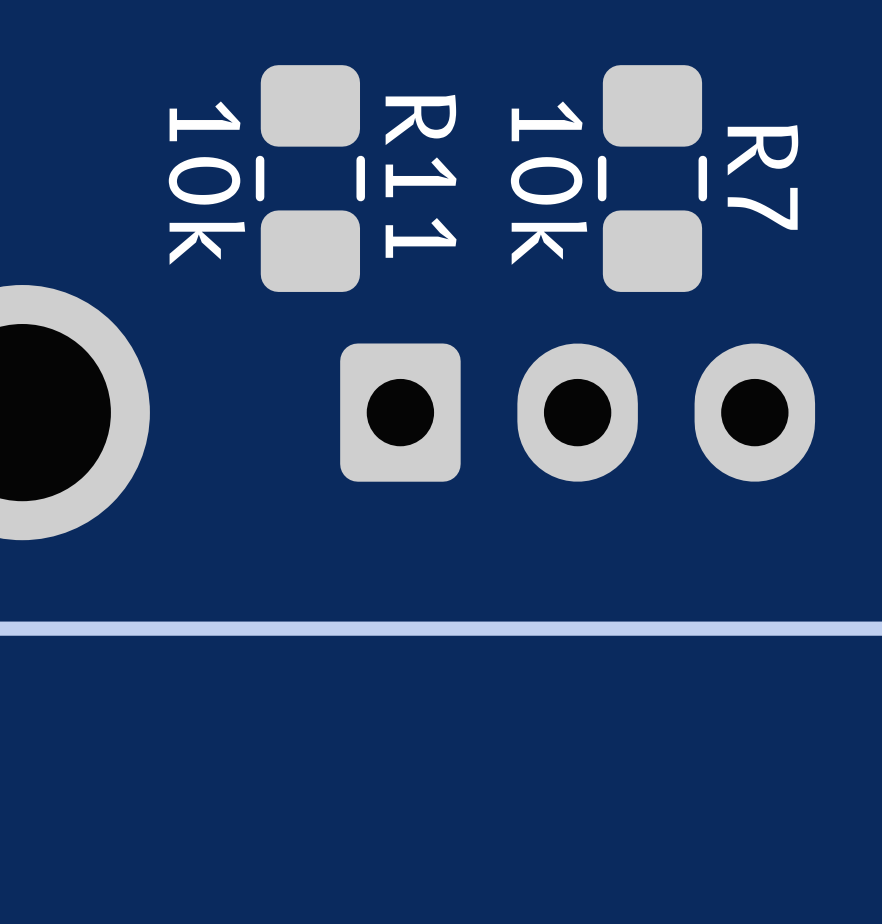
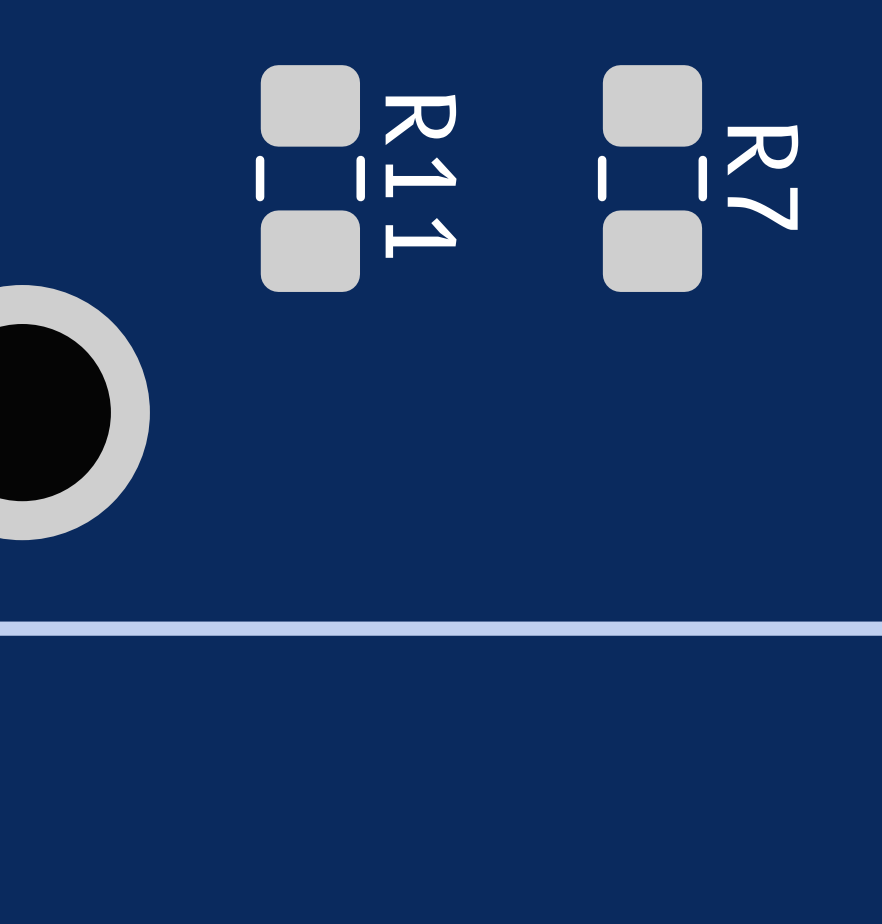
text: 10k (206, 183) -> none
text: 10k (549, 183) -> none
part: (577, 412) -> none

